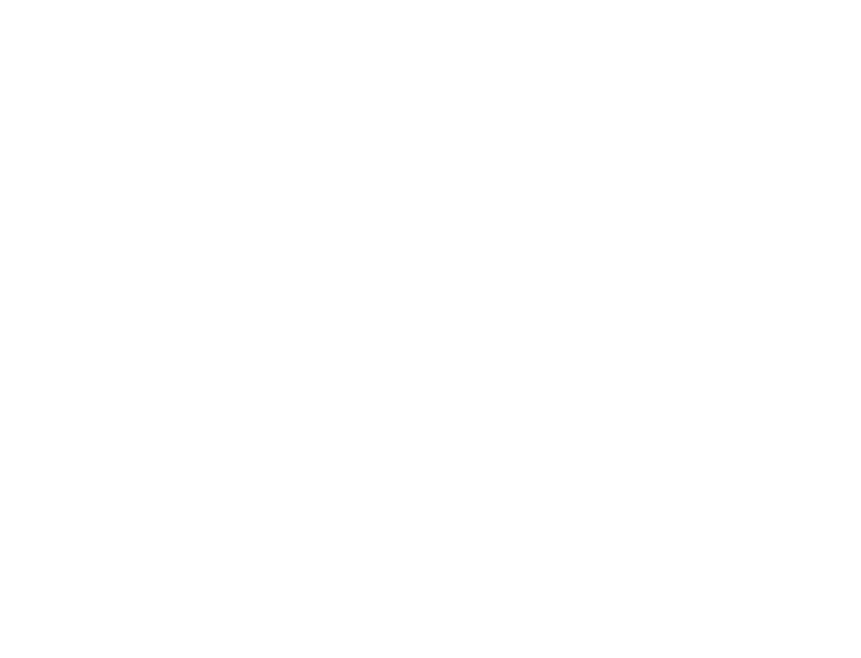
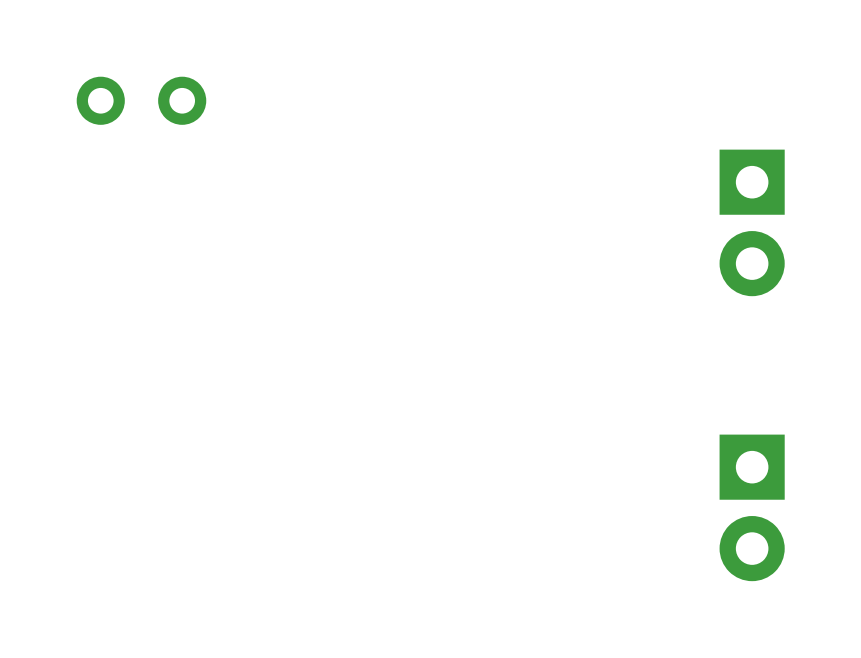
part: none -> (141, 100)
part: none -> (752, 222)
part: none -> (752, 507)

